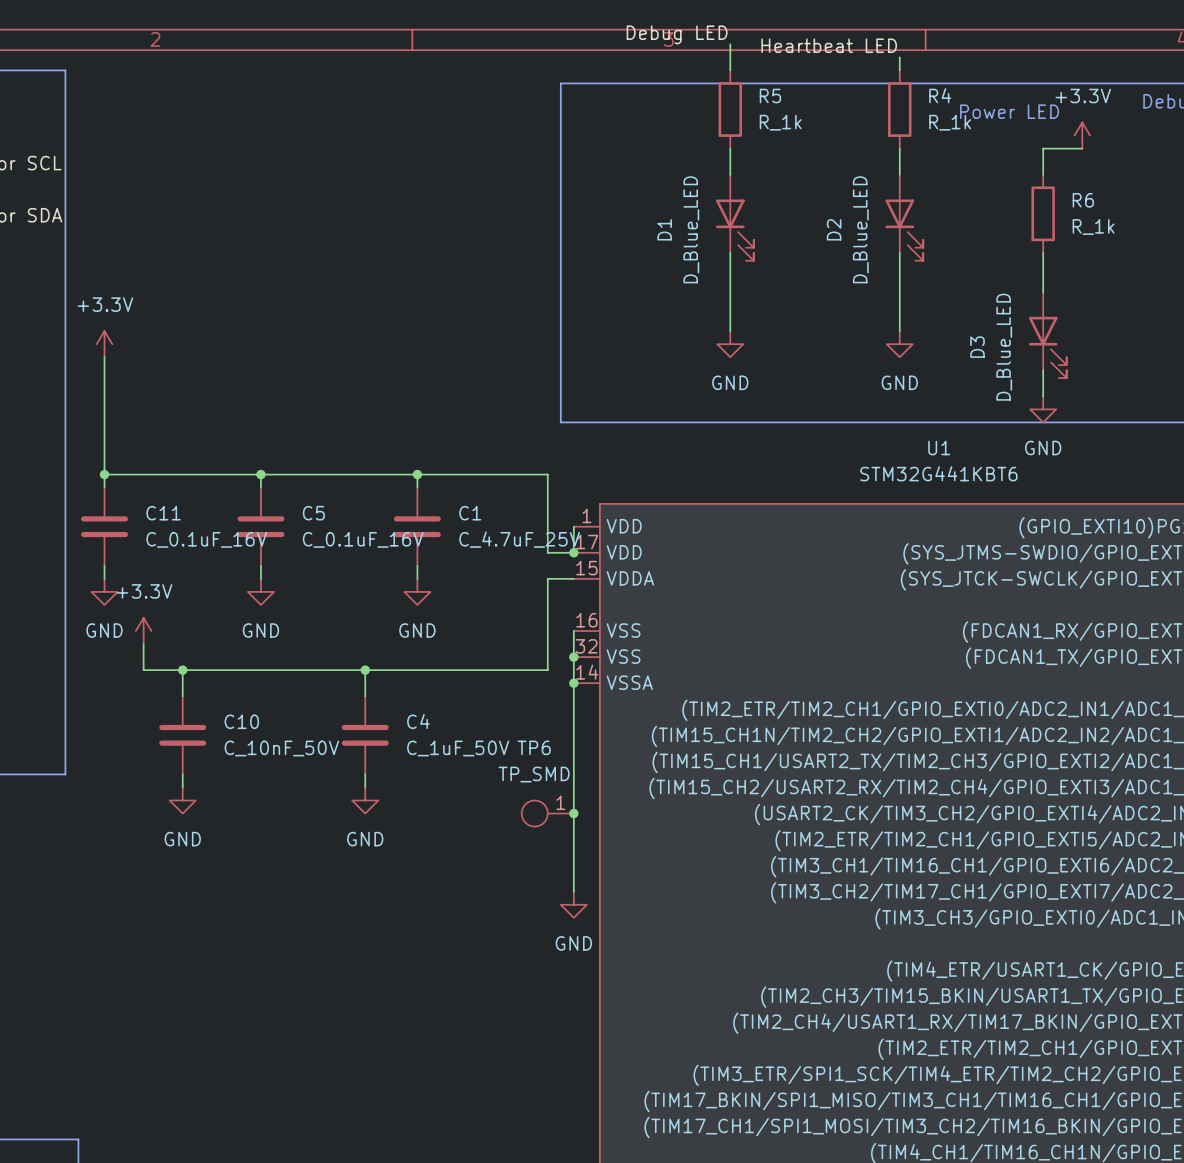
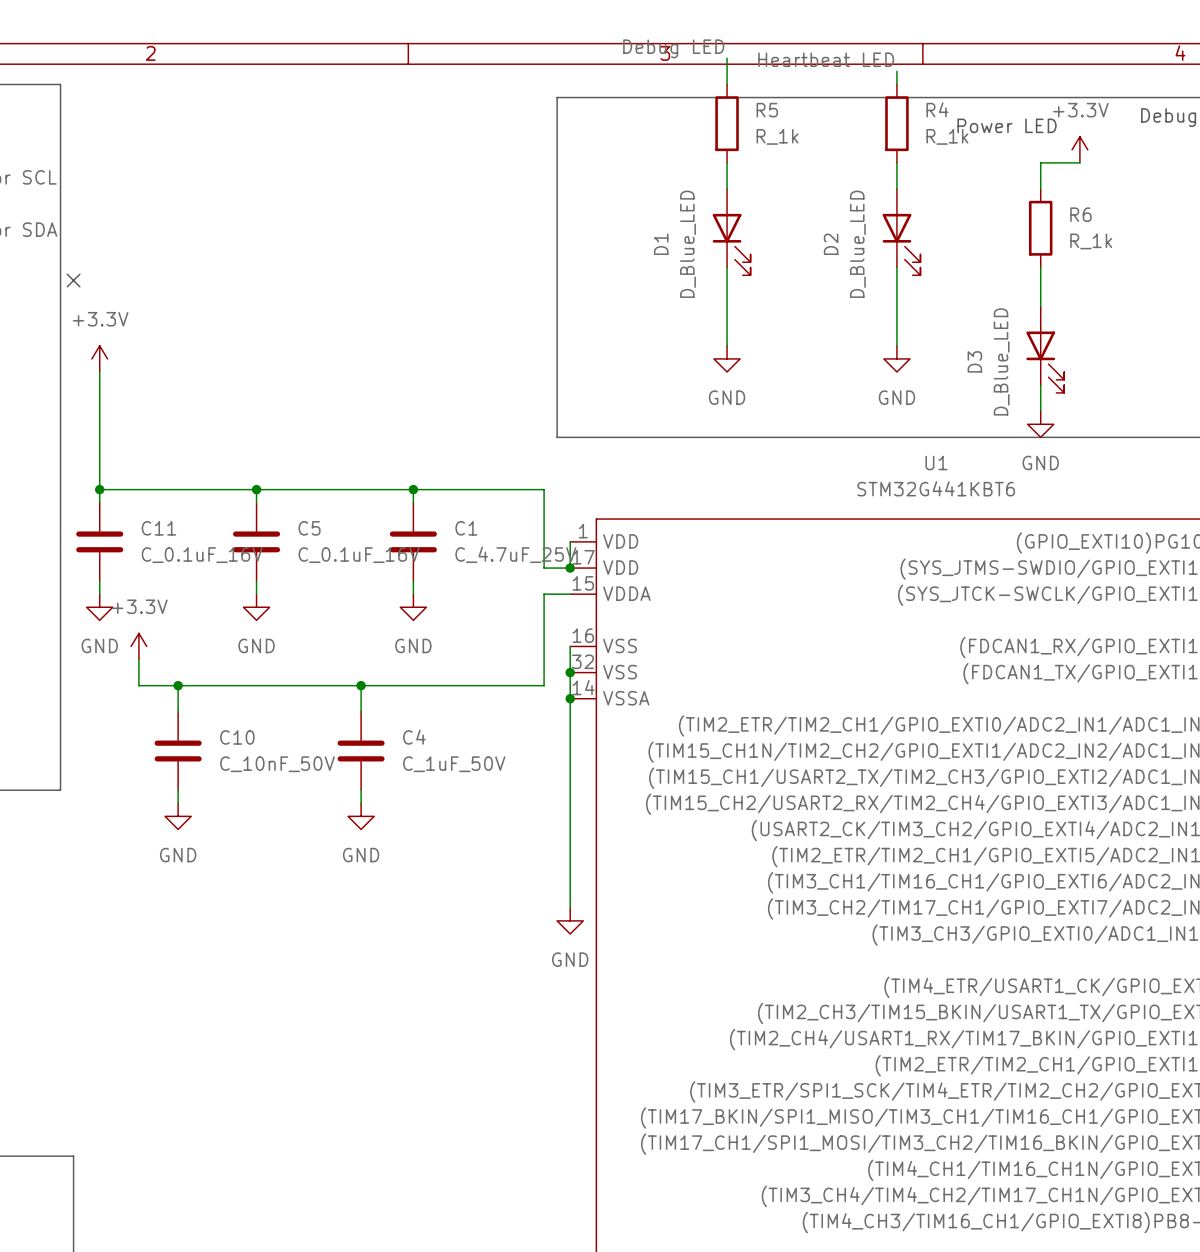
no-connect mark: none -> (73, 280)
TP6: TP_SMD (547, 813) -> none
junction: (573, 813) -> none

